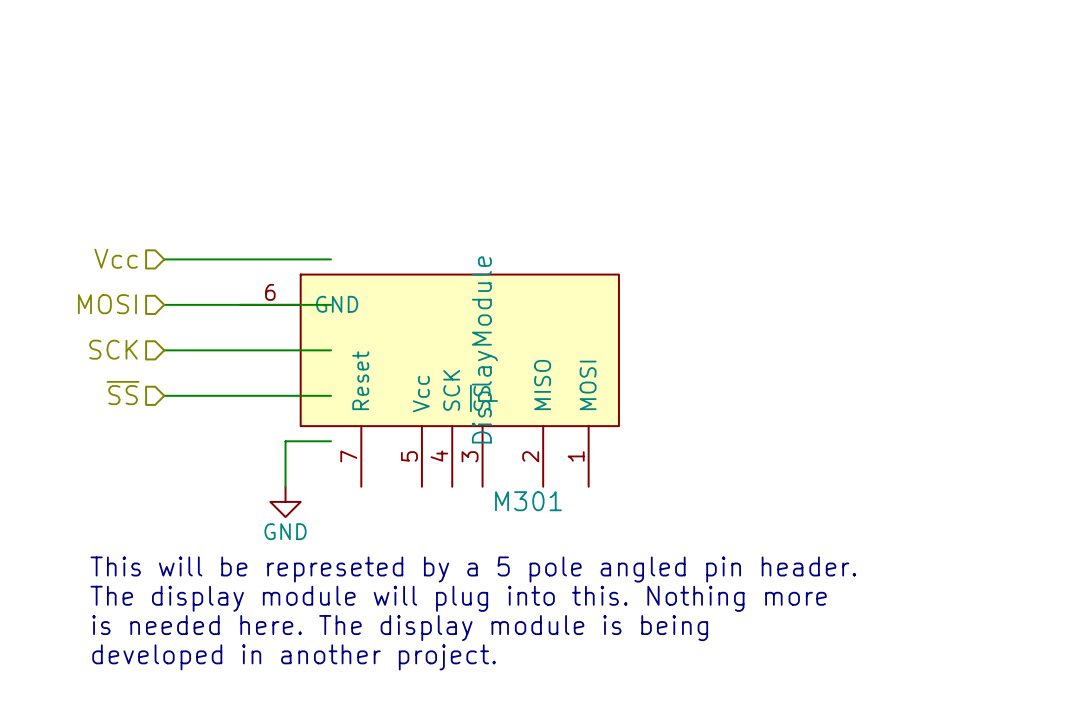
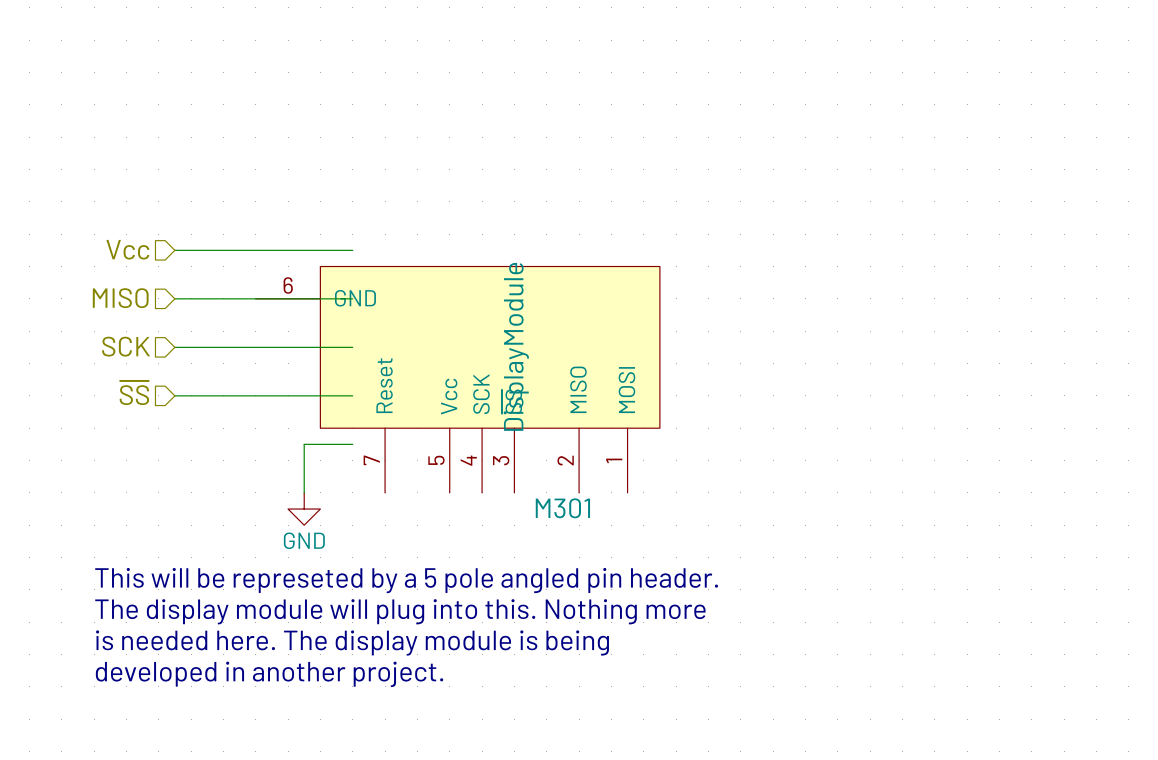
hierarchical label: MOSI (107, 304) -> MISO (120, 298)

